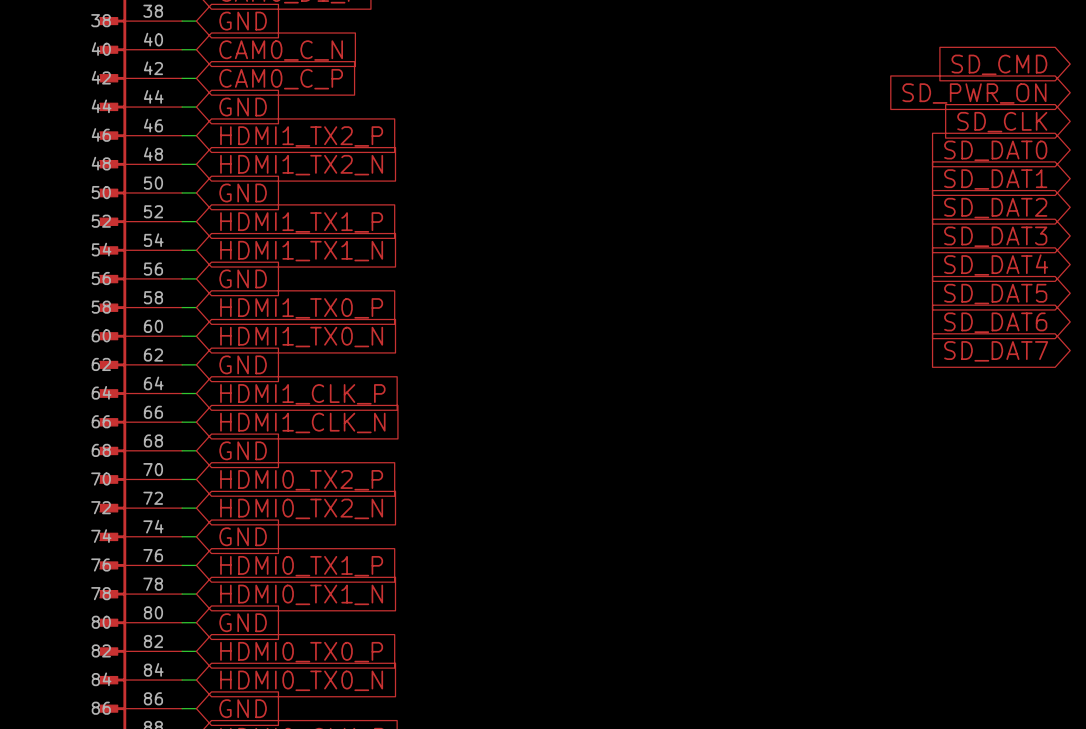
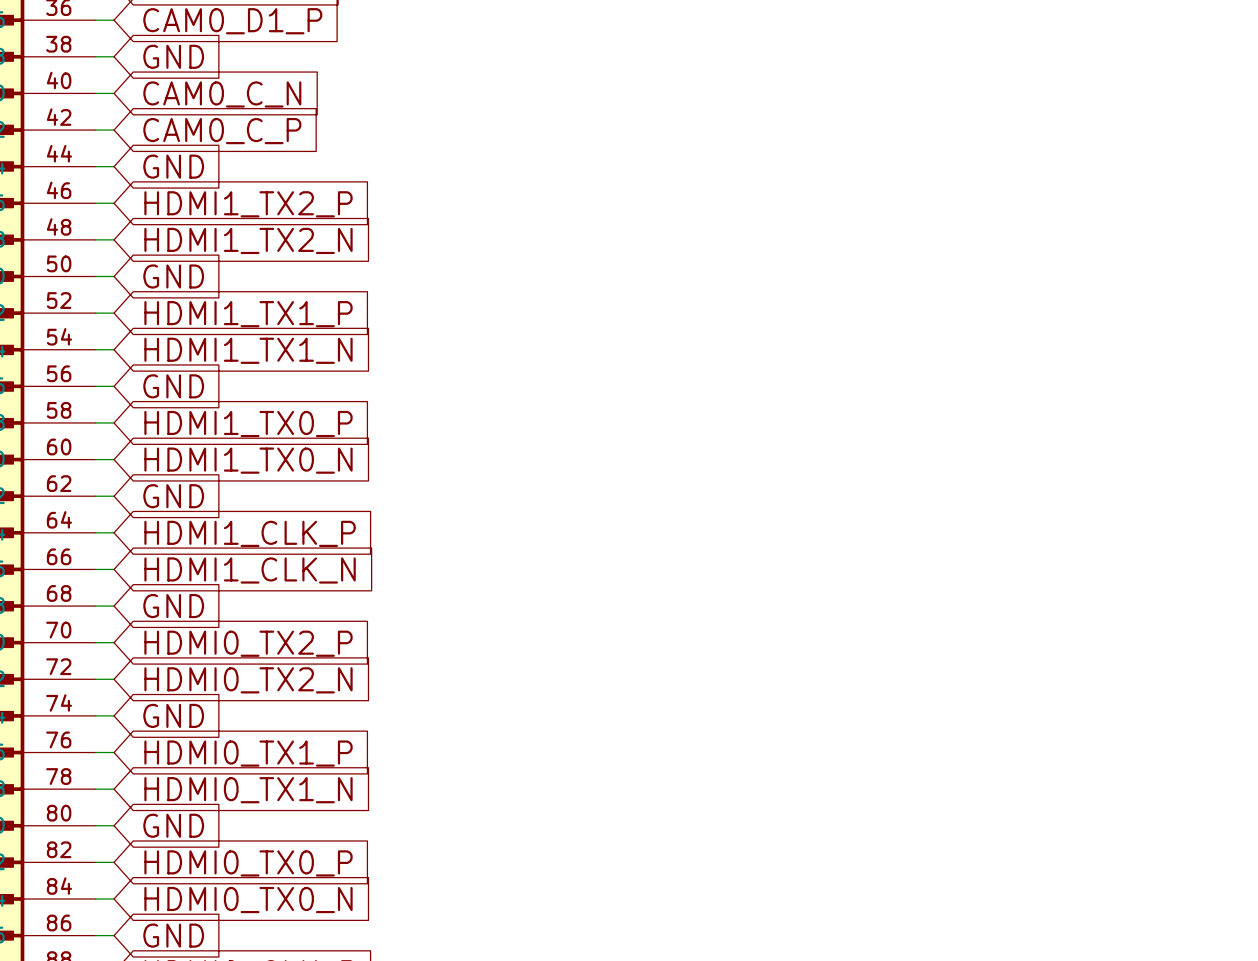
global label: SD_CMD (999, 64) -> none
global label: SD_PWR_ON (974, 93) -> none
global label: SD_CLK (1002, 122) -> none
global label: SD_DAT0 (995, 150) -> none
global label: SD_DAT1 (995, 179) -> none
global label: SD_DAT2 (995, 208) -> none
global label: SD_DAT3 (995, 236) -> none
global label: SD_DAT4 (996, 265) -> none
global label: SD_DAT5 (995, 294) -> none
global label: SD_DAT6 (995, 322) -> none
global label: SD_DAT7 (996, 351) -> none

